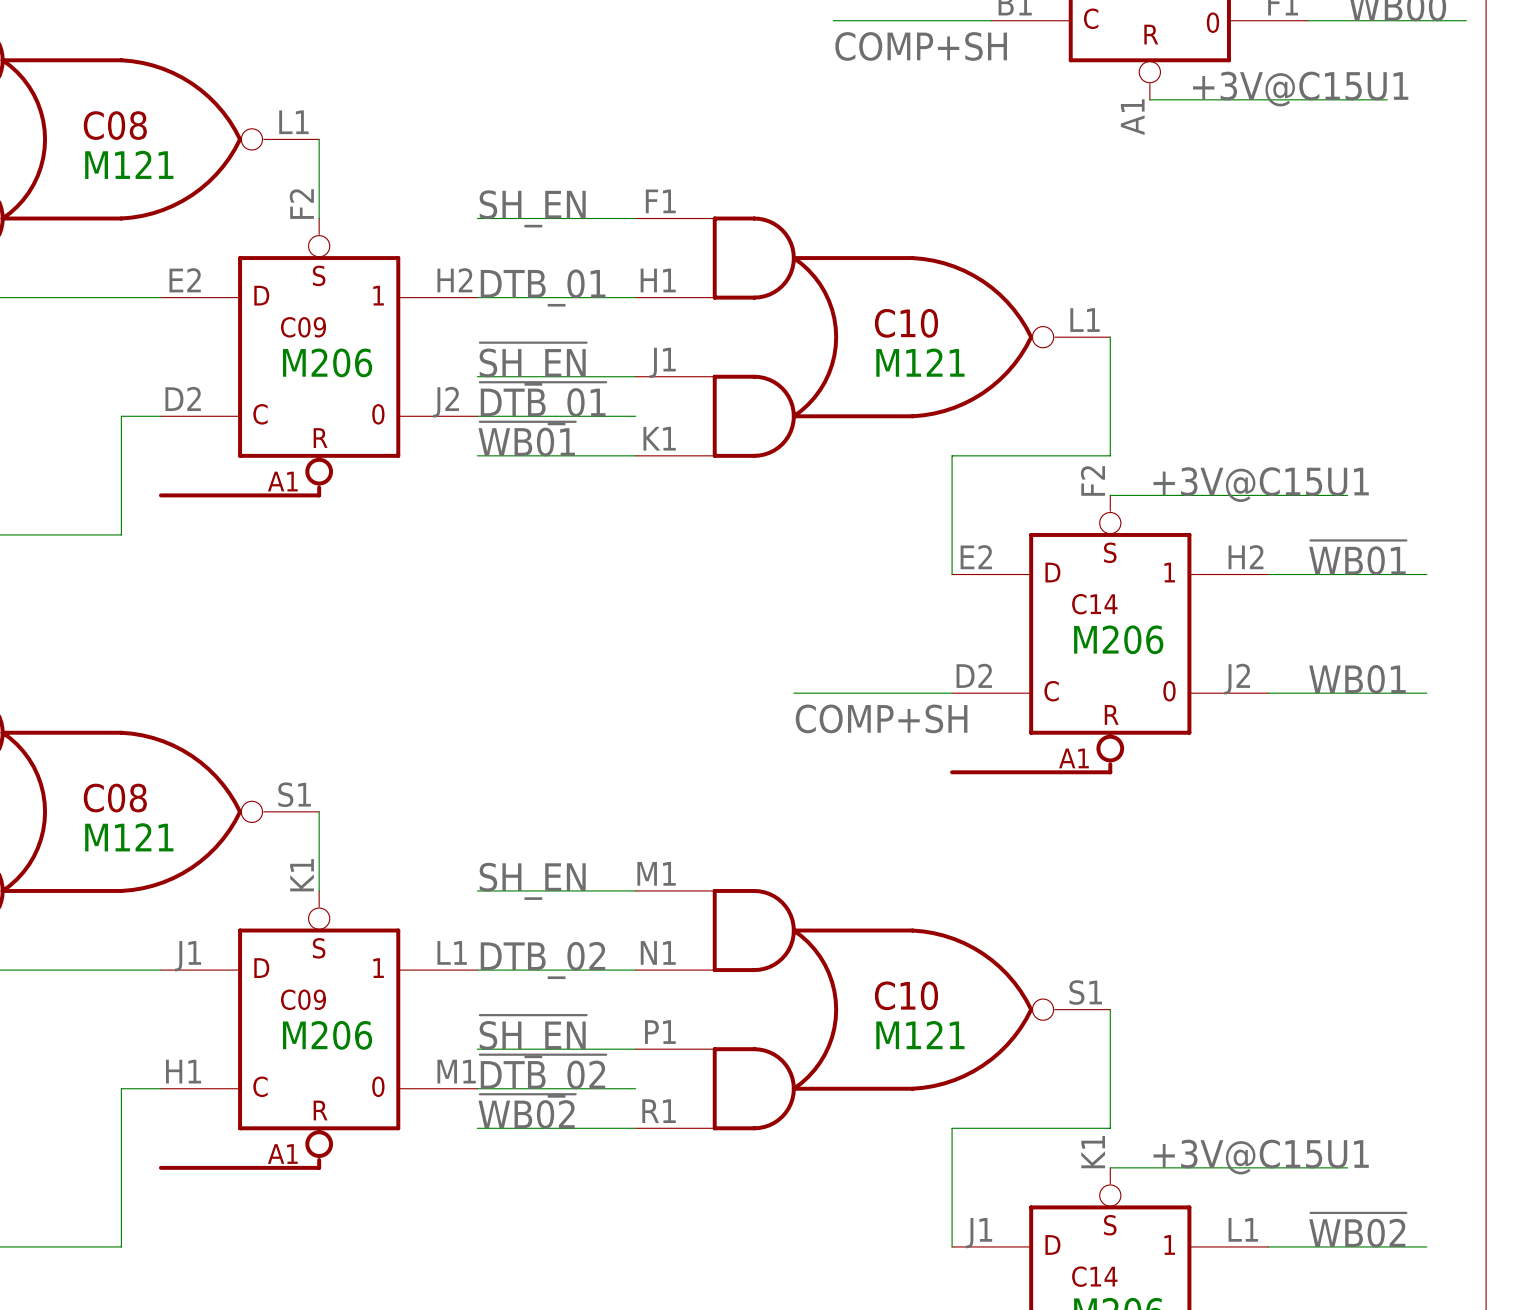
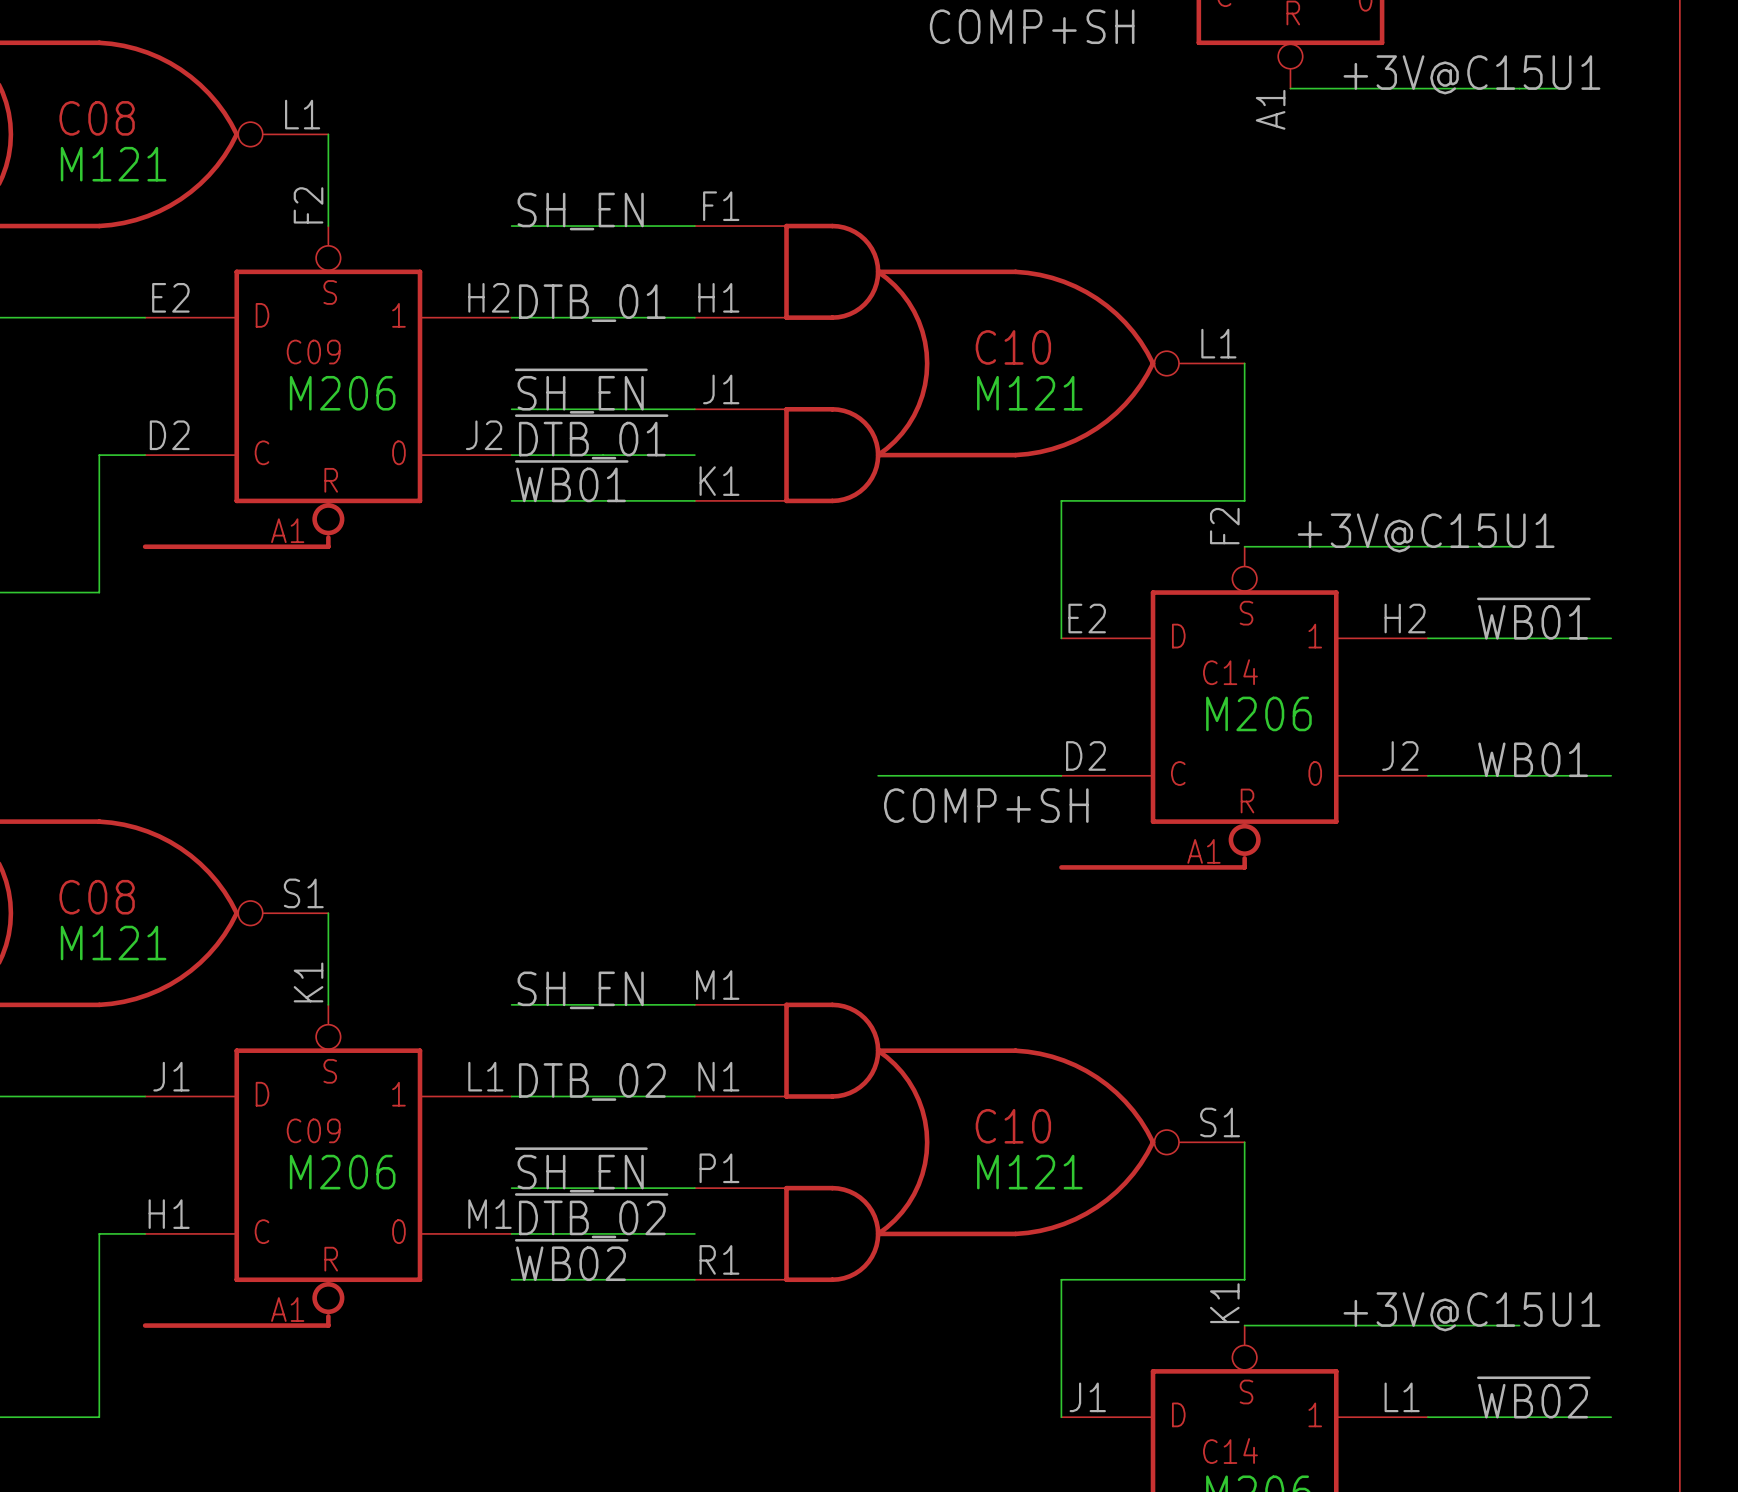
label position: +3V@C15U1 (1261, 1157) -> +3V@C15U1 (1471, 1311)

